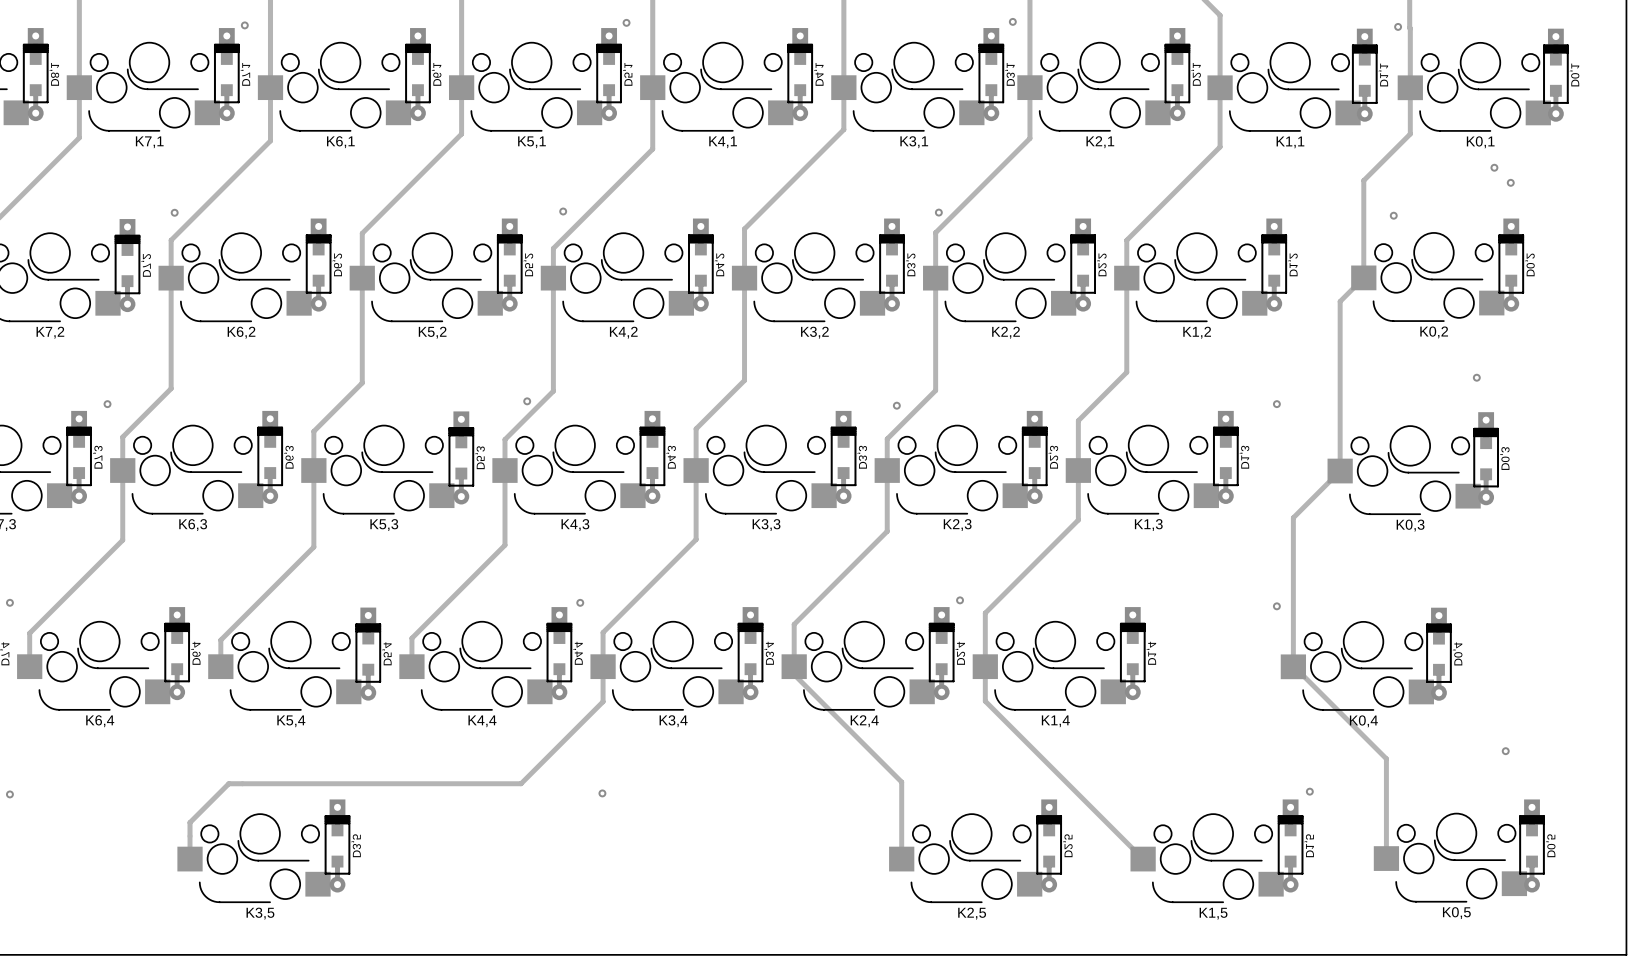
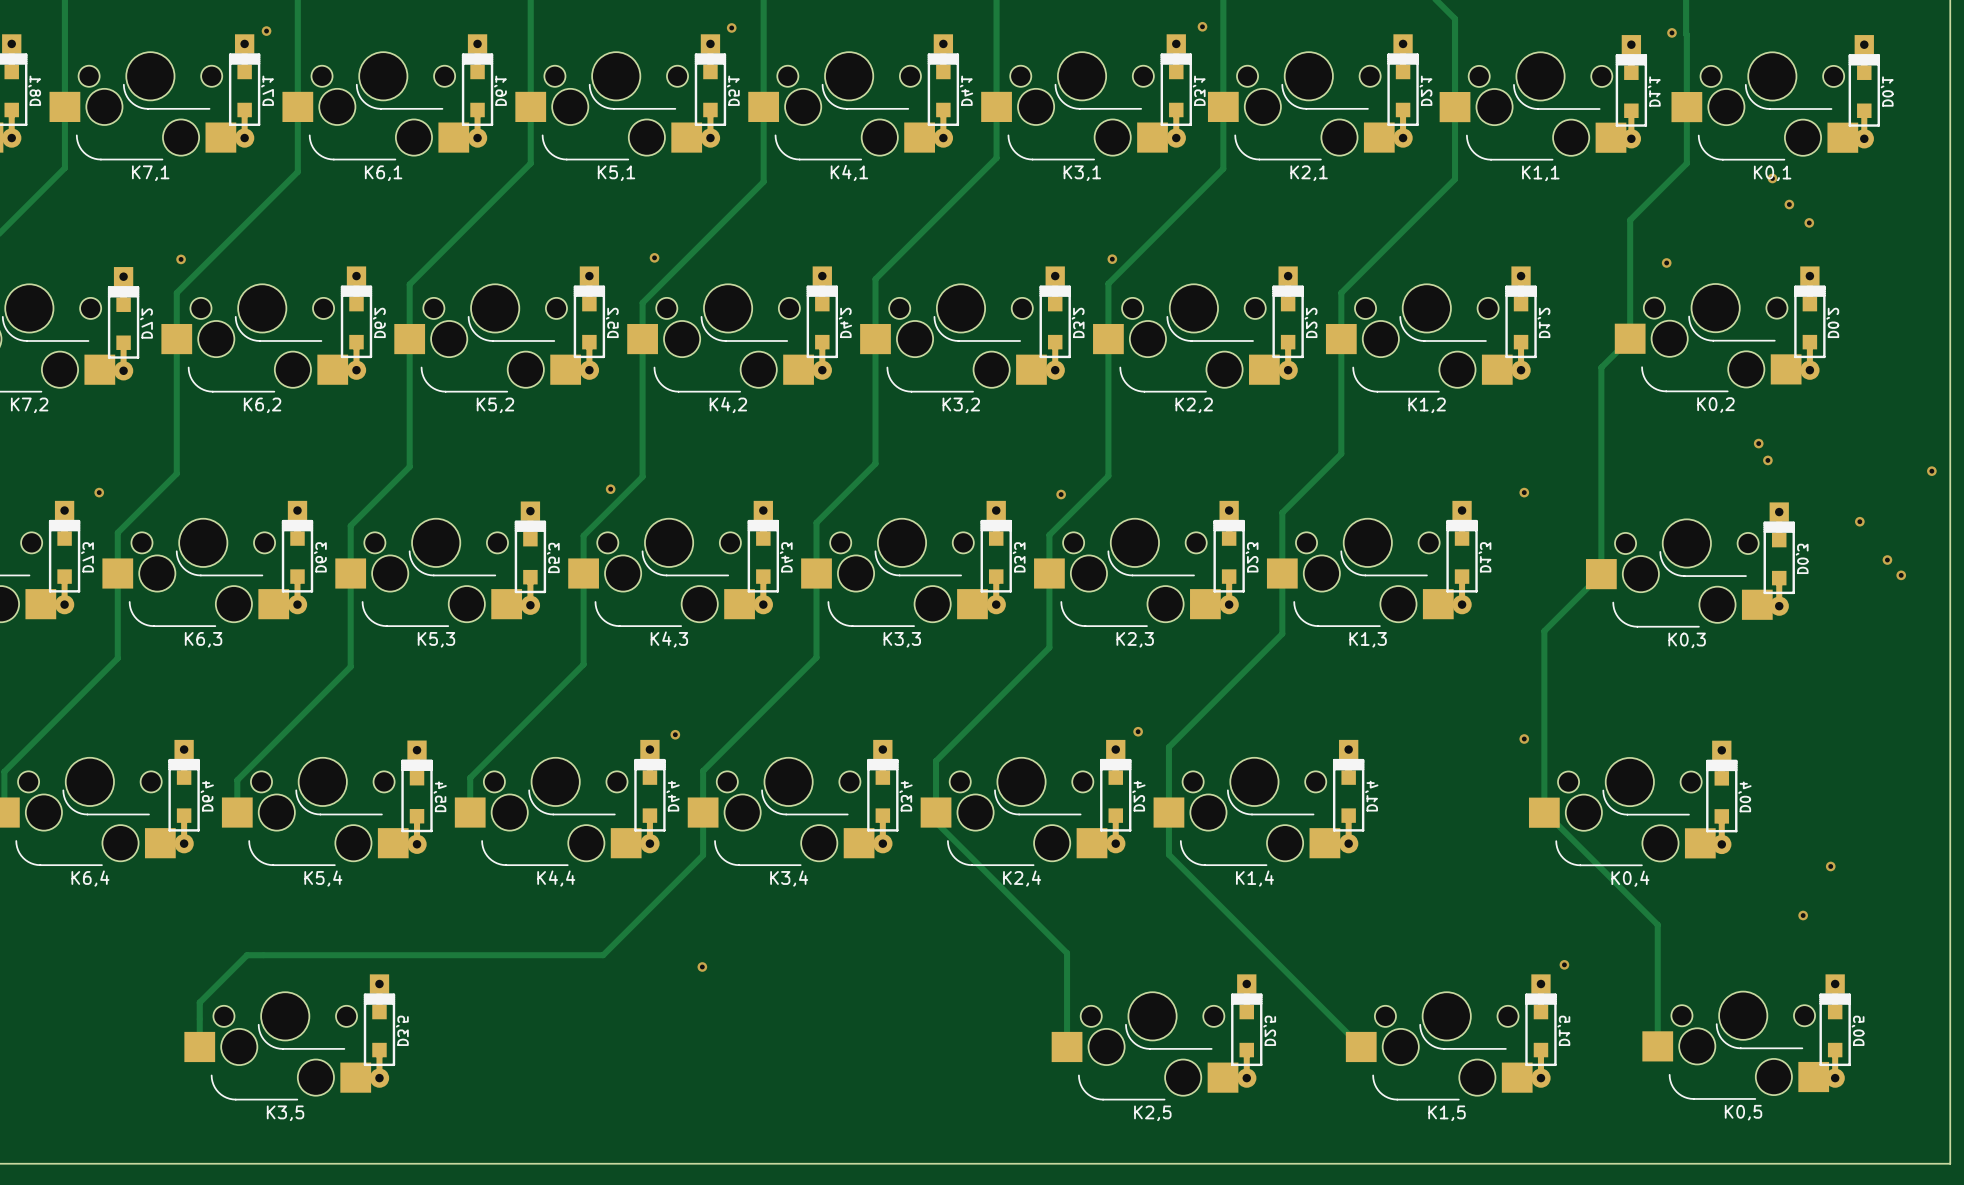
via: none -> (1772, 178)
via: none -> (1758, 443)
via: none -> (1931, 471)
via: none -> (1859, 521)
via: none -> (1887, 560)
via: none -> (1901, 575)
via: none -> (1830, 866)

